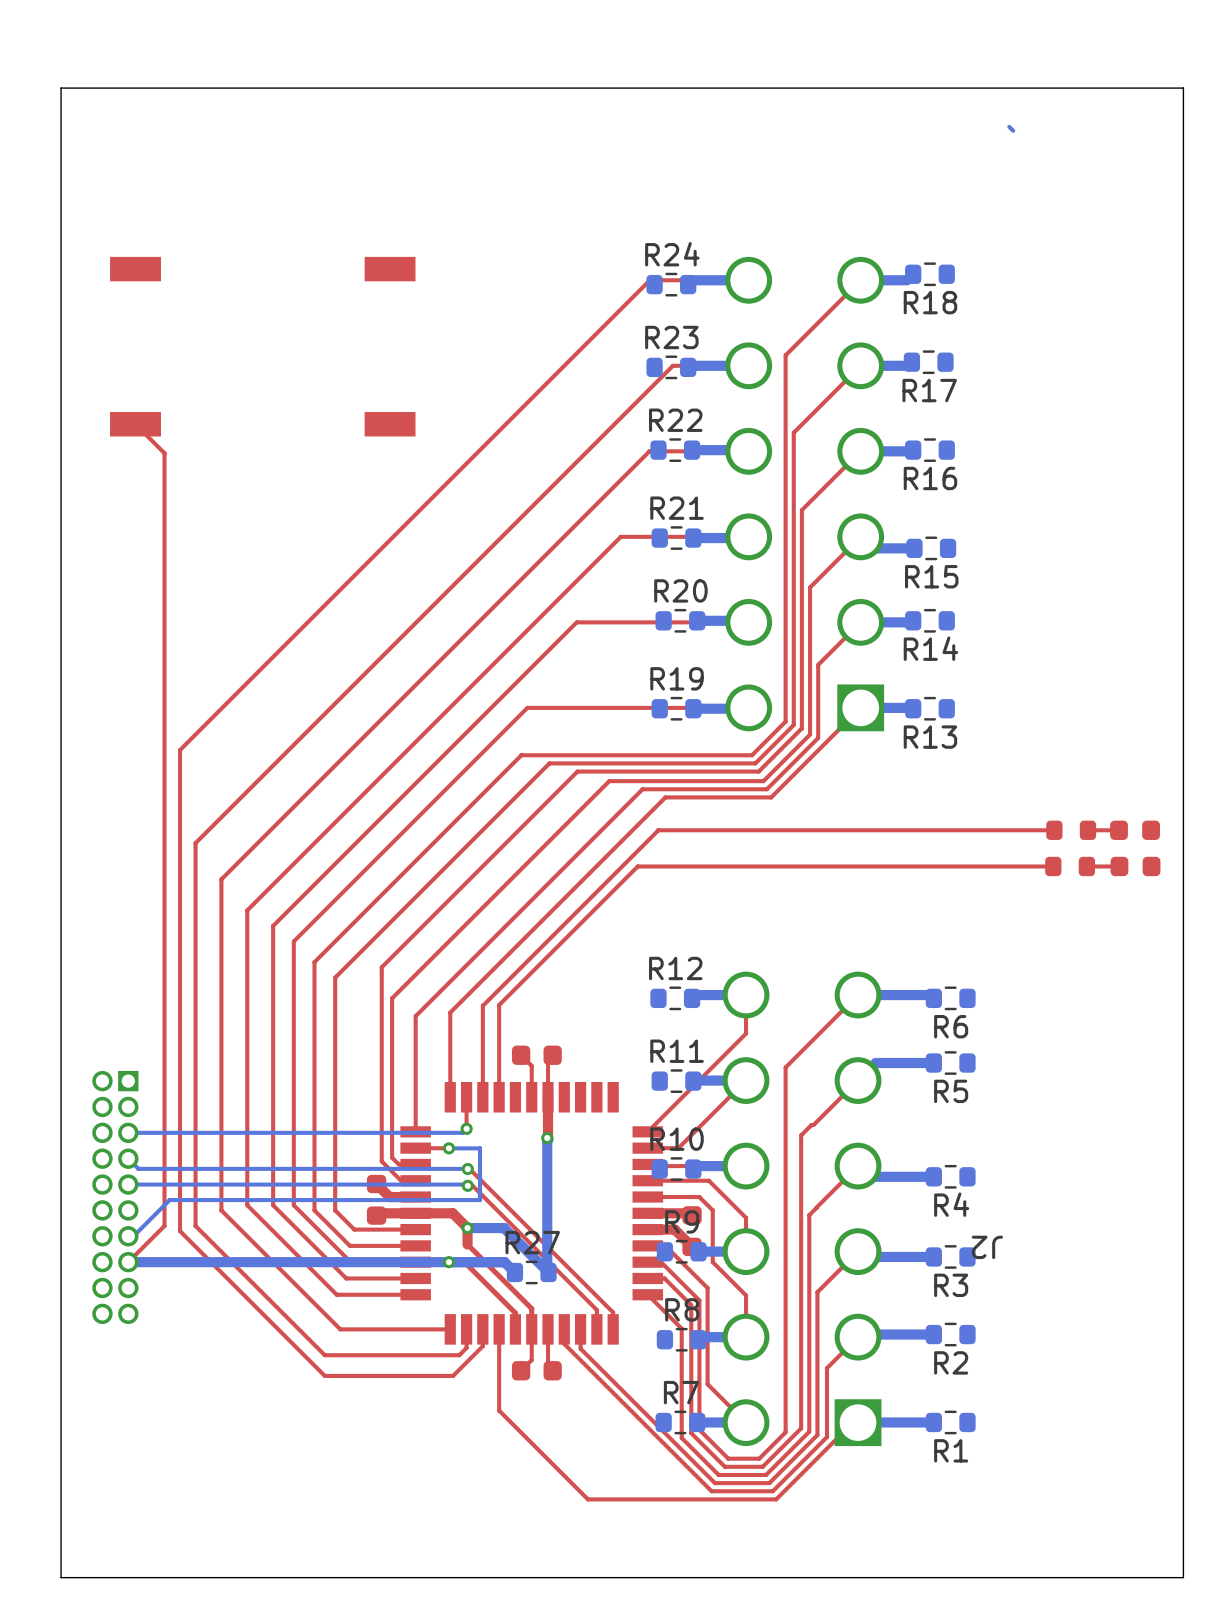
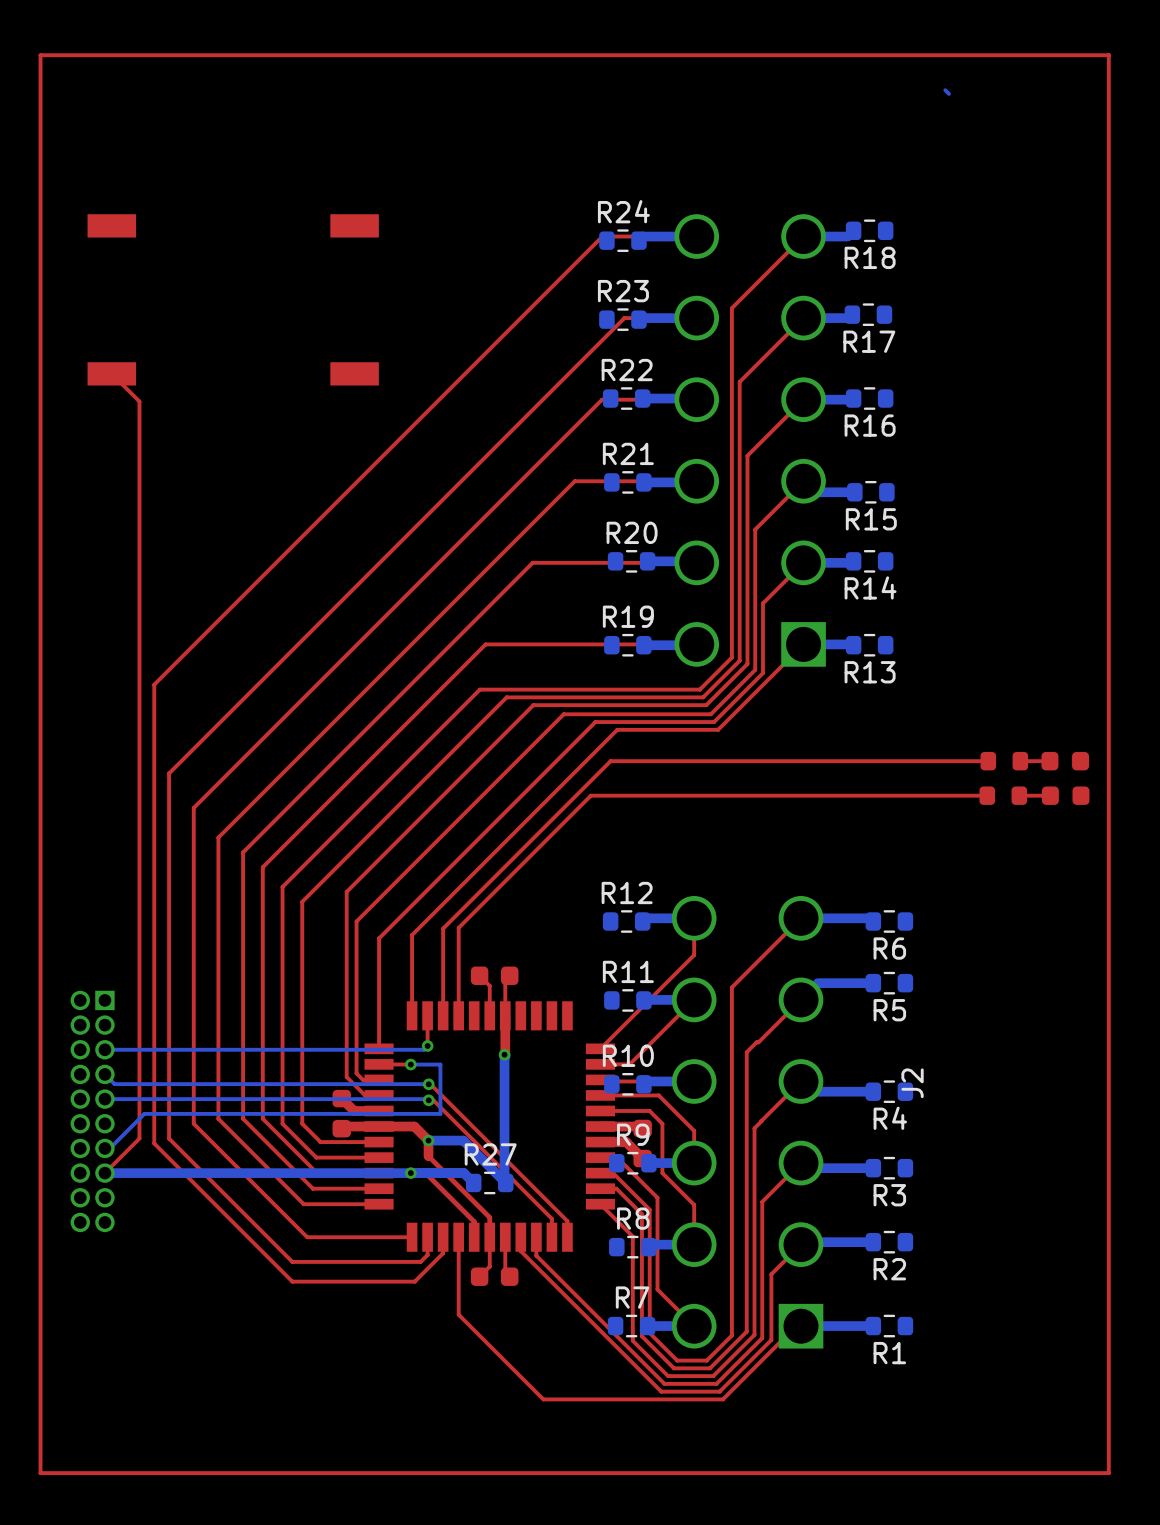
board edge: (1183, 88) (61, 88) (61, 1577) (1183, 1577) (1183, 88) -> none
top track: none -> (1108, 55) (40, 55) (40, 1473) (1108, 1473) (1108, 55)
J2 name rotation: 0° (987, 1247) -> 90° clockwise (912, 1083)
J2 name position: J2 (987, 1247) -> J2 (912, 1083)

